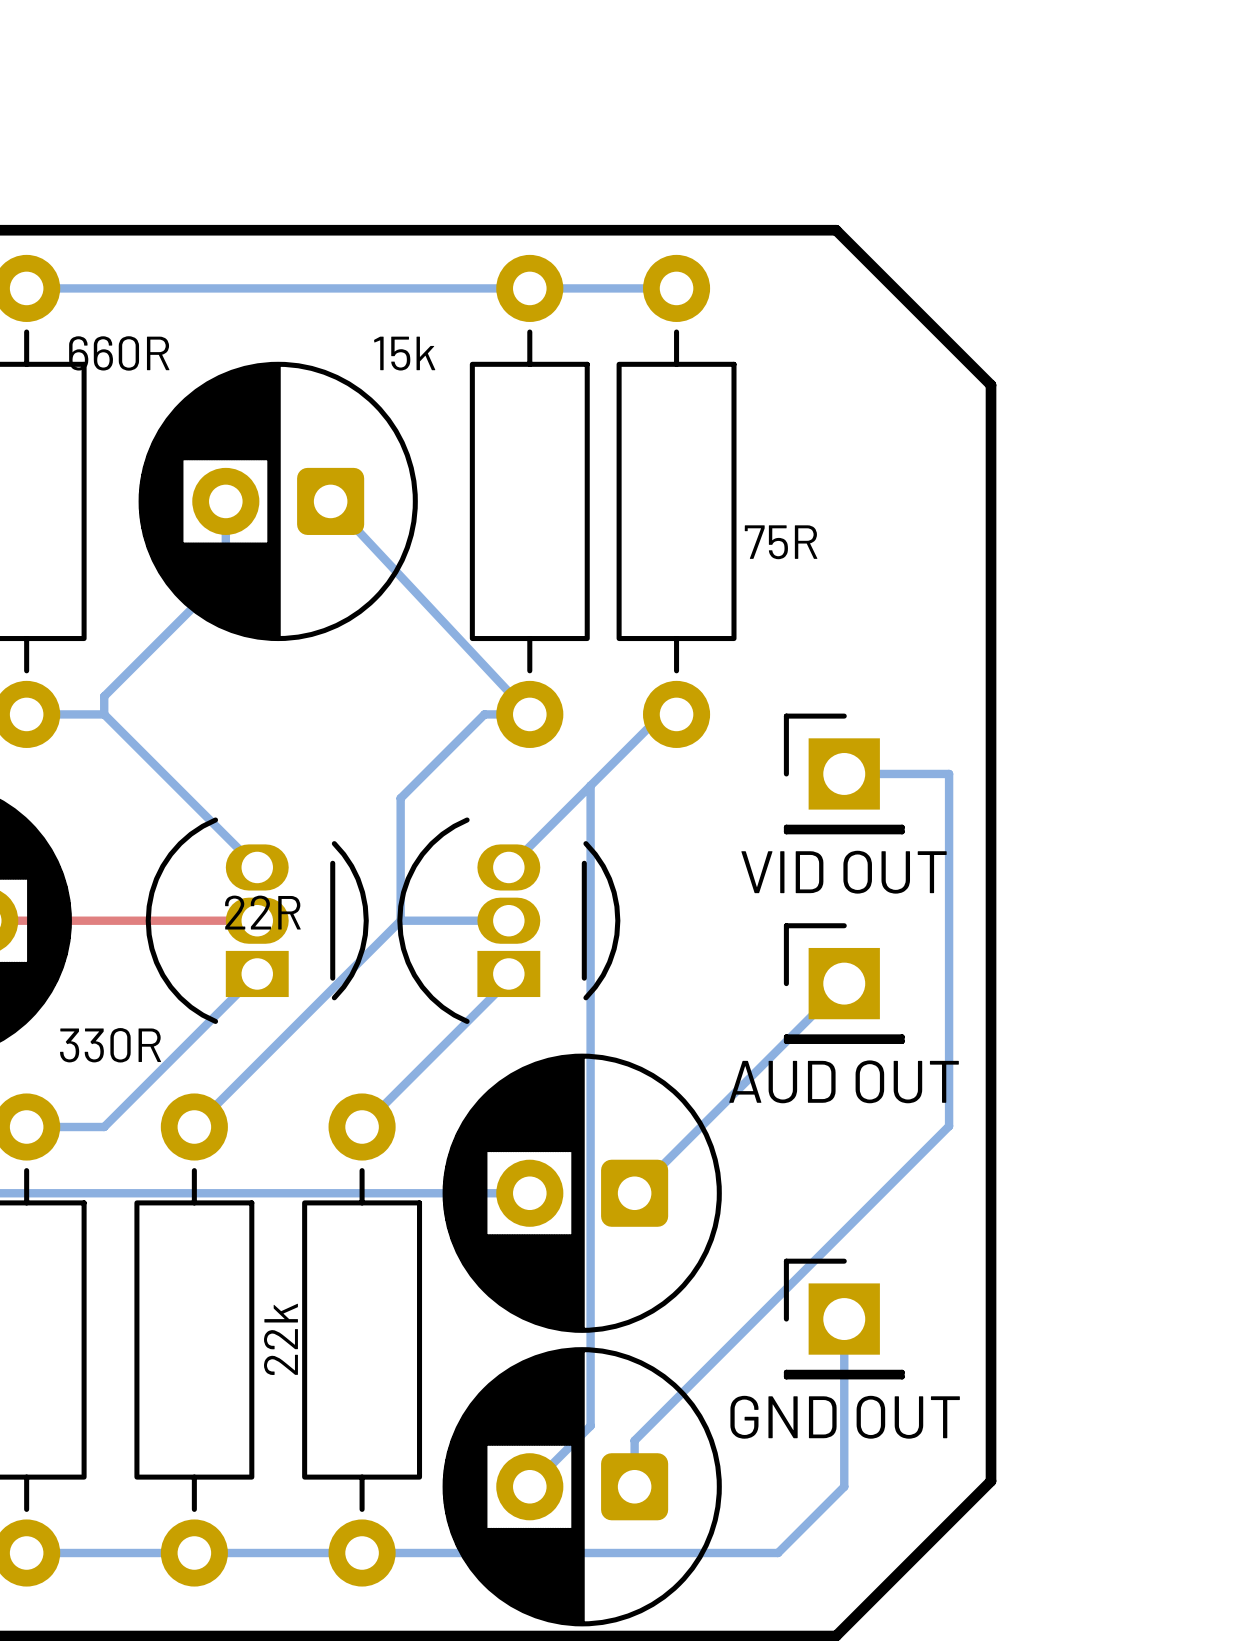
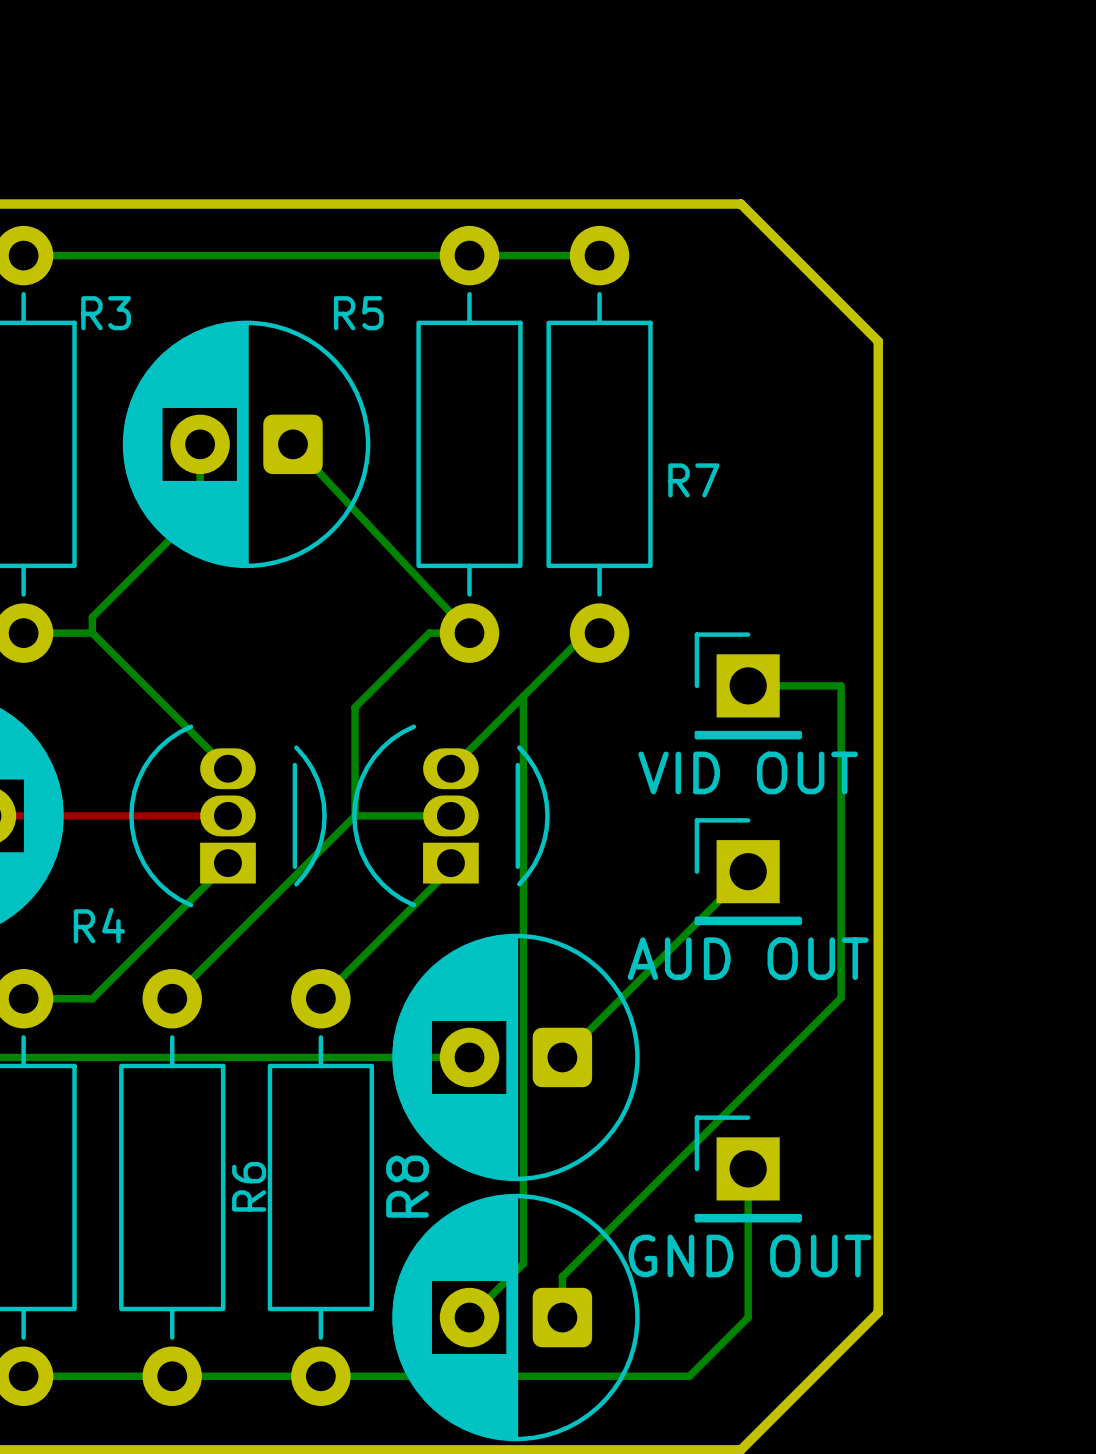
text: 660R (119, 353) -> R3 (106, 313)
text: 15k (404, 353) -> R5 (358, 313)
text: 75R (781, 542) -> R7 (693, 480)
text: 22R (262, 912) -> none
text: 330R (110, 1045) -> R4 (99, 925)
text: 22k (280, 1339) -> R6 (249, 1186)
R8 name: none -> R8 (407, 1186)

